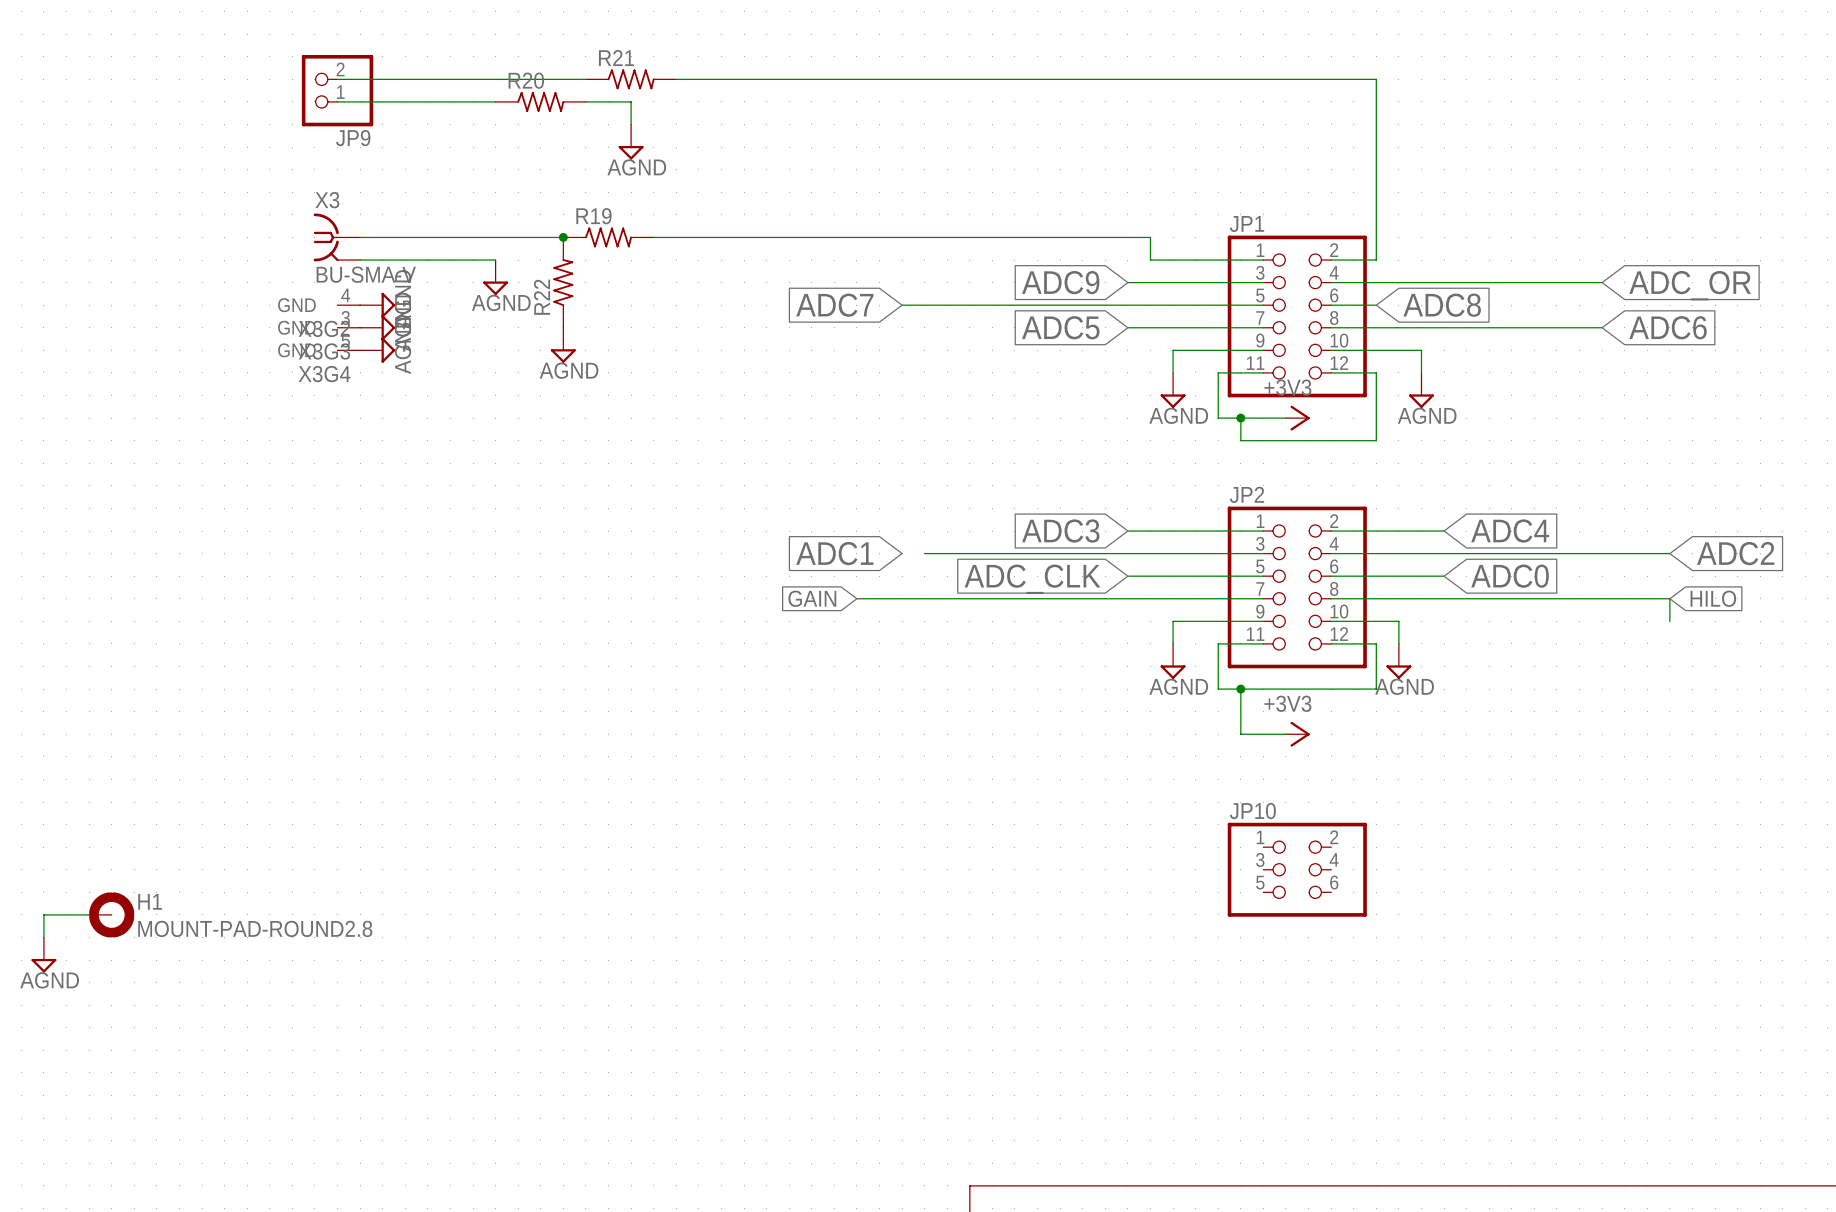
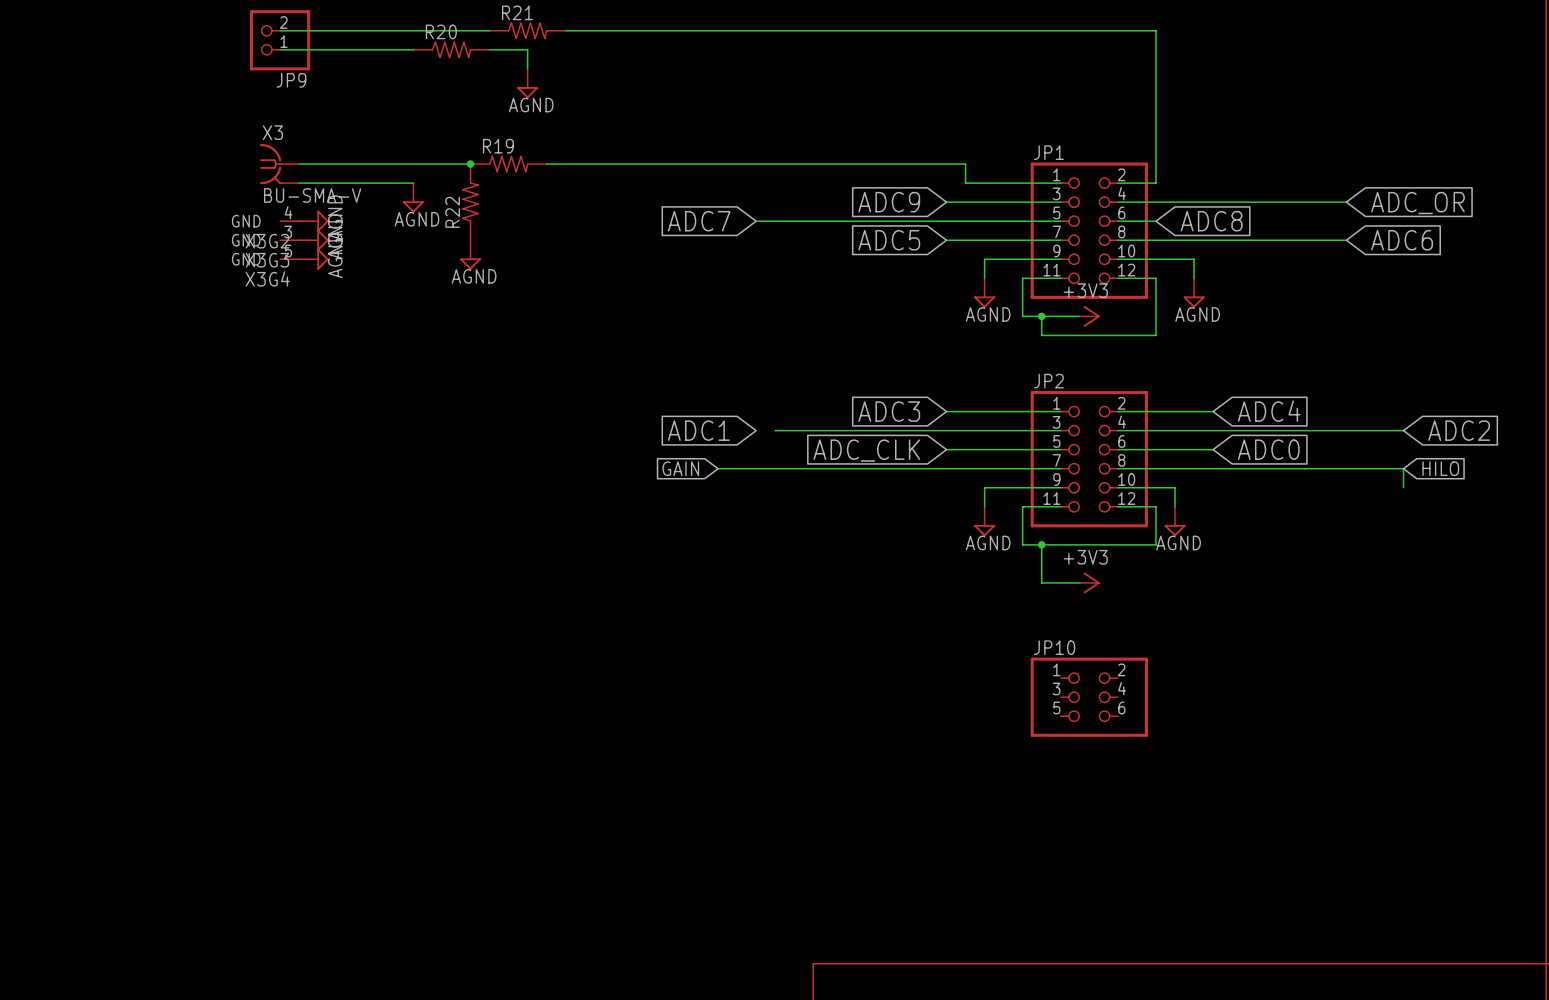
wire: (89, 914) (43, 914) (43, 937) -> none
H1: MOUNT-PAD-ROUND2.8 (111, 914) -> none
power symbol: AGND (43, 954) -> none

